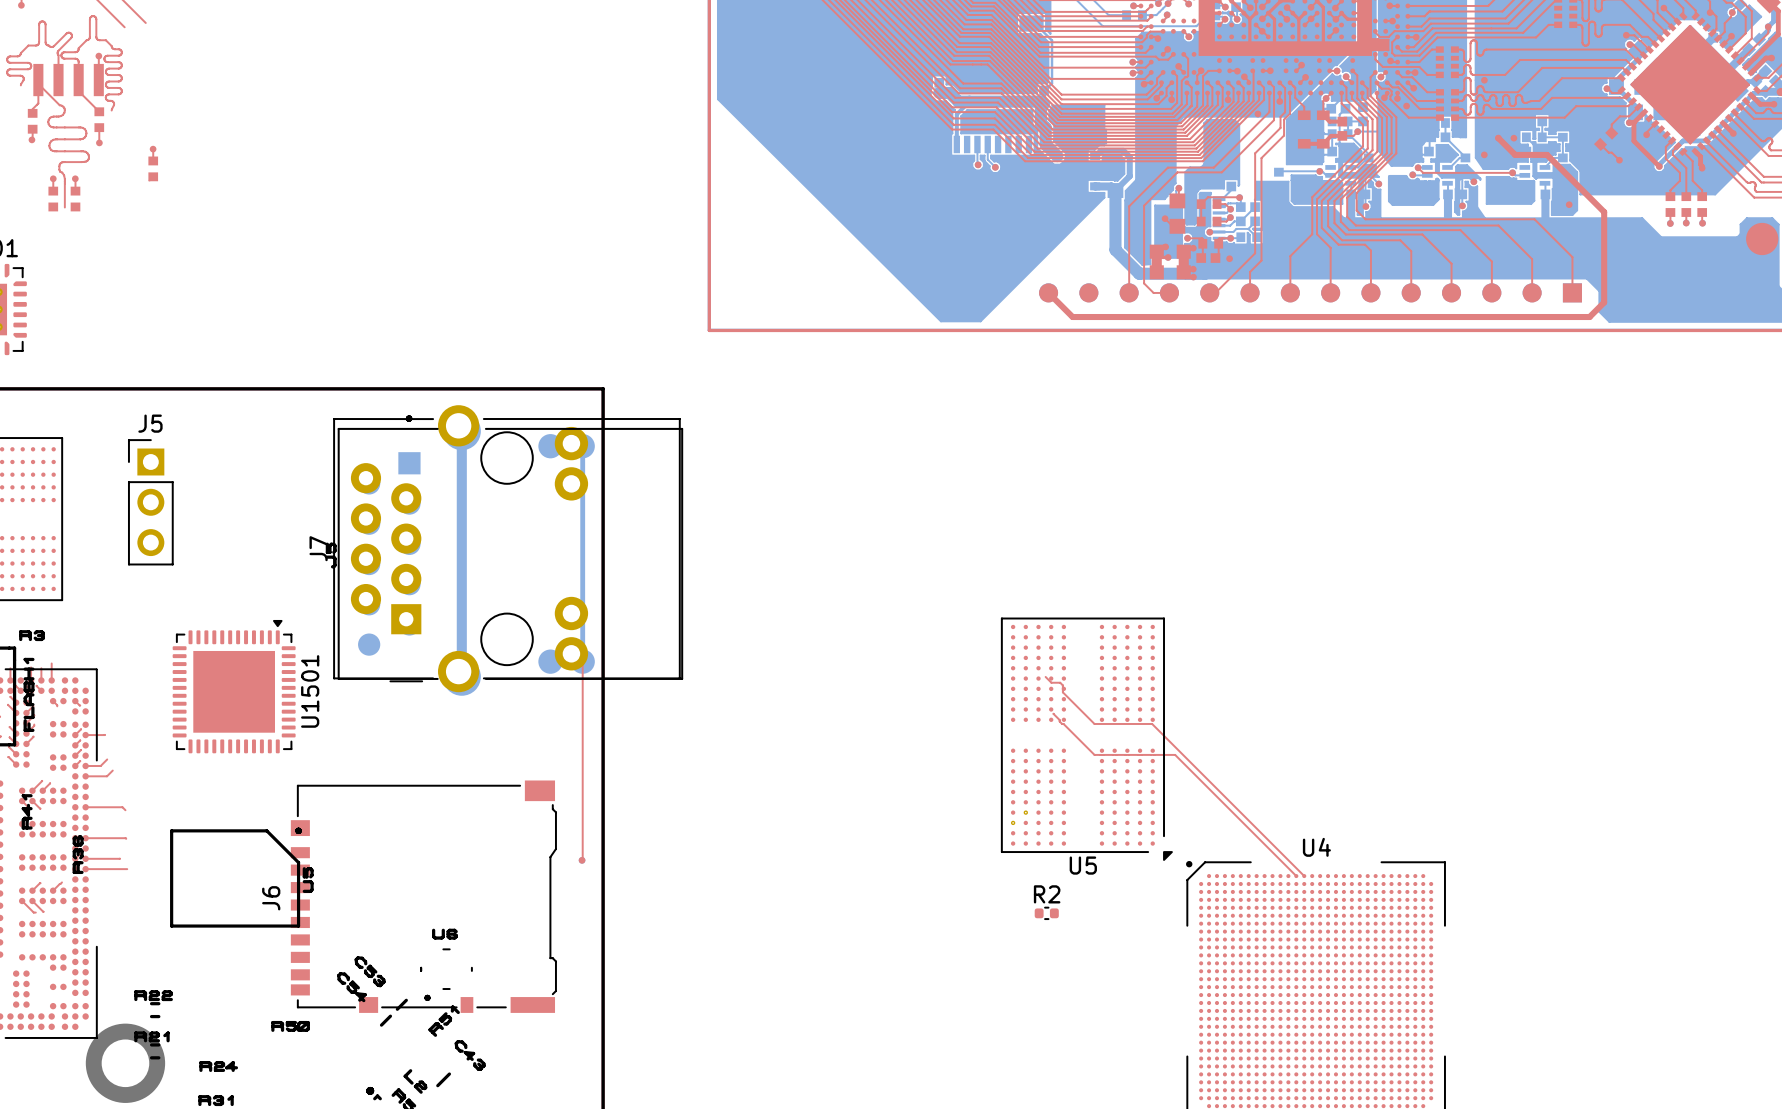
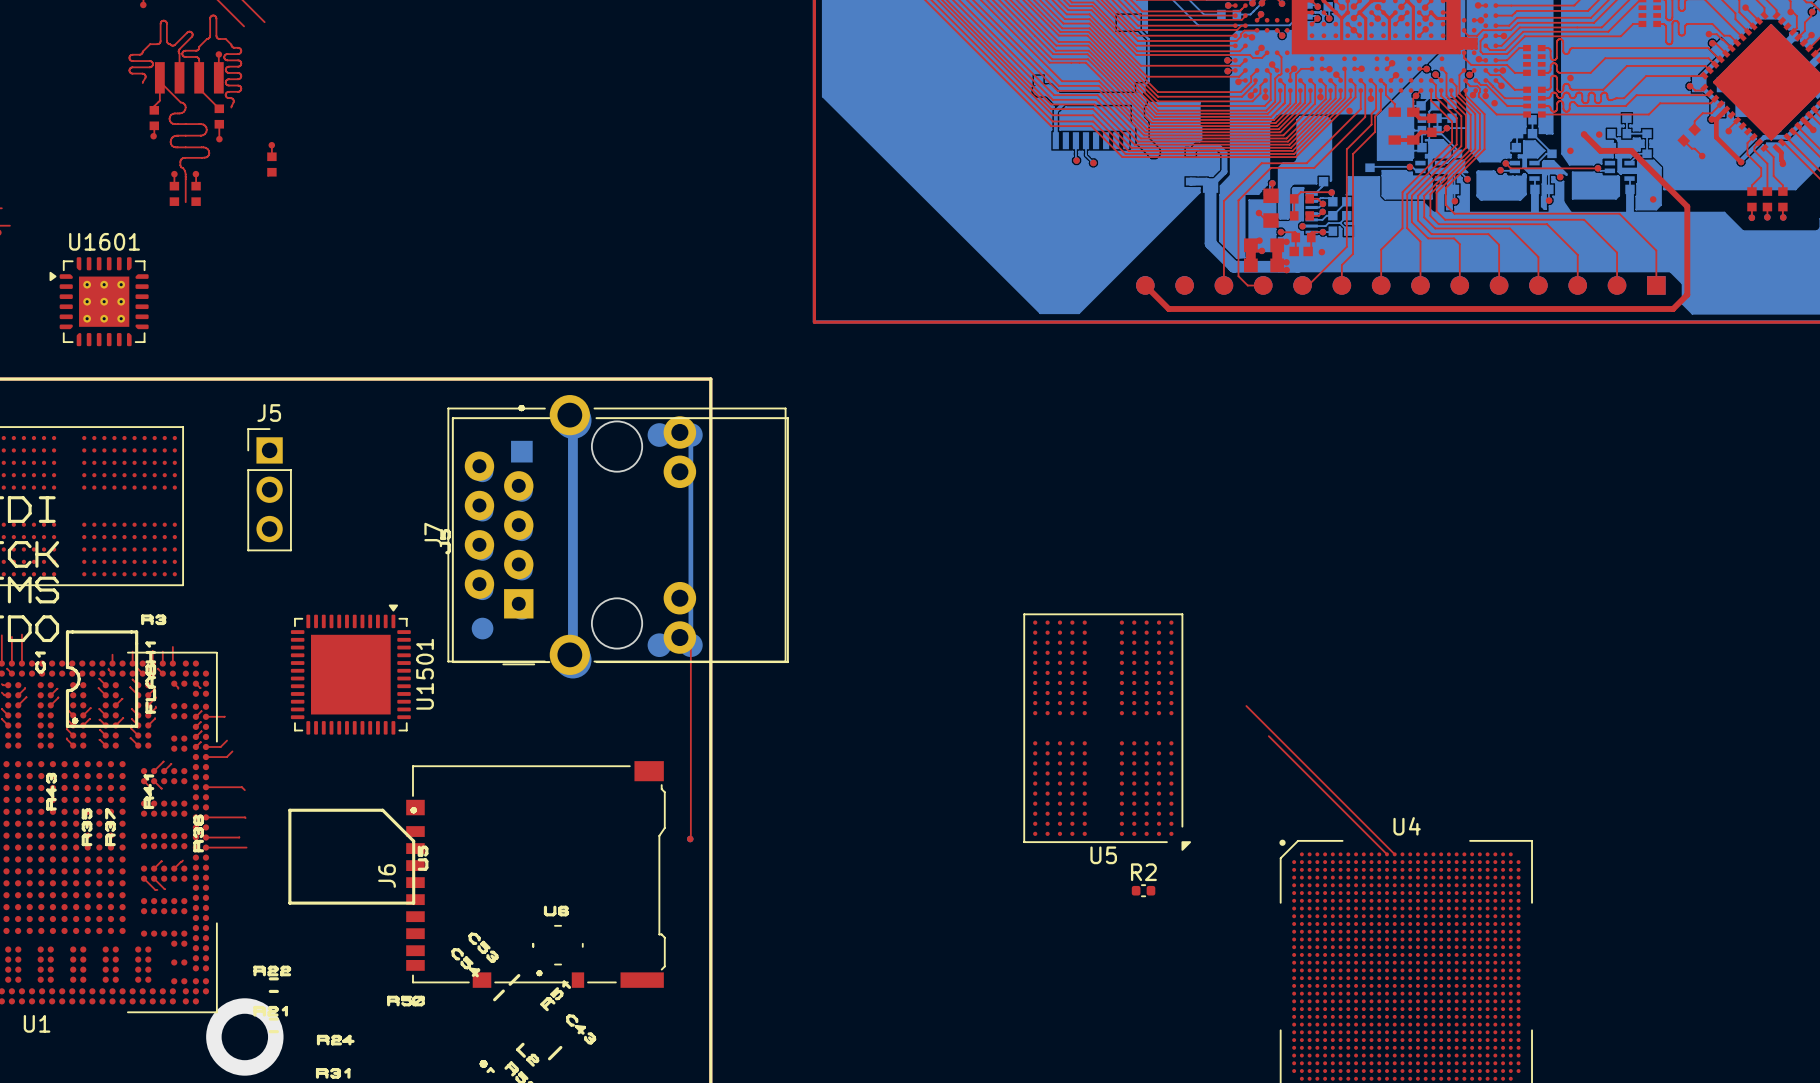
U5 footprint: [1000, 617, 1173, 861] -> [1023, 613, 1192, 851]
top track: (1045, 676) (1051, 682) (1060, 682) (1062, 685) (1062, 692) (1094, 723) (1152, 723) -> none
top track: (1053, 713) (1094, 754) (1175, 754) -> none

